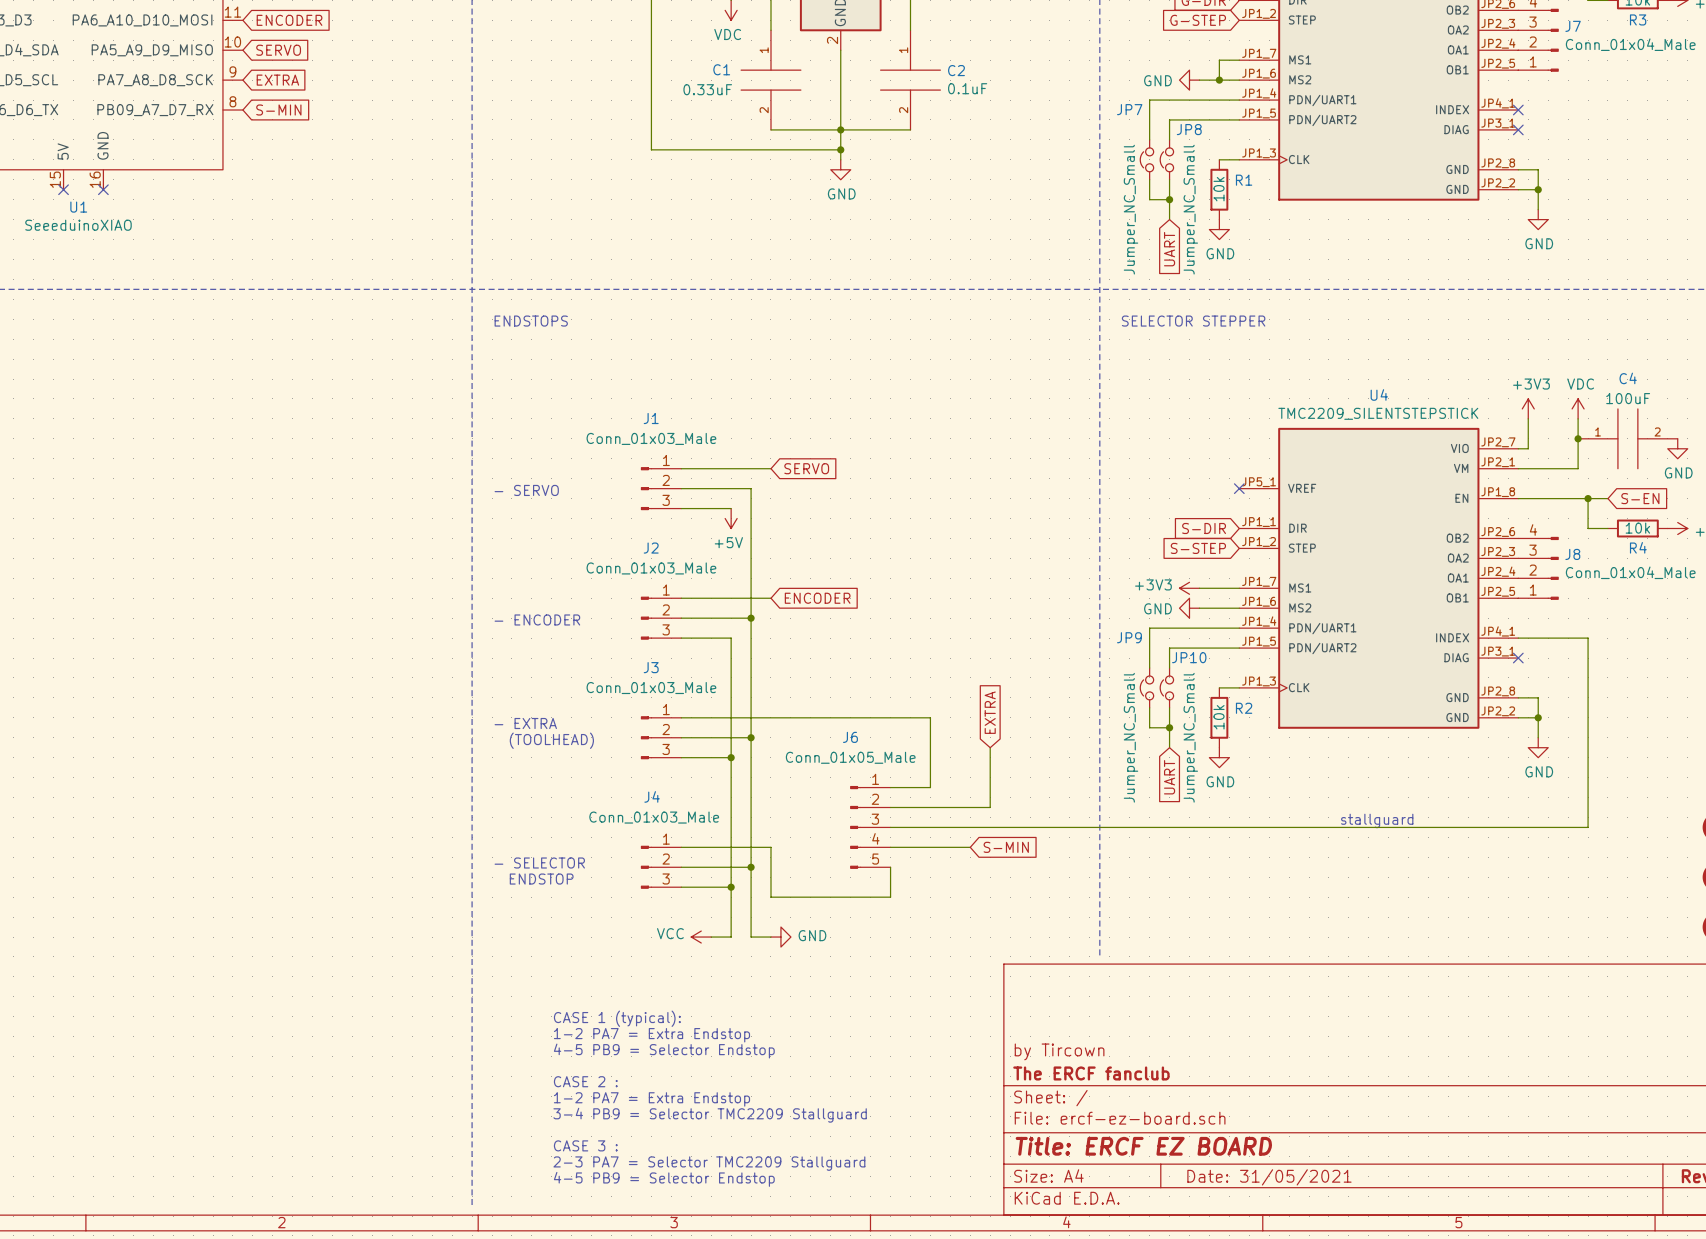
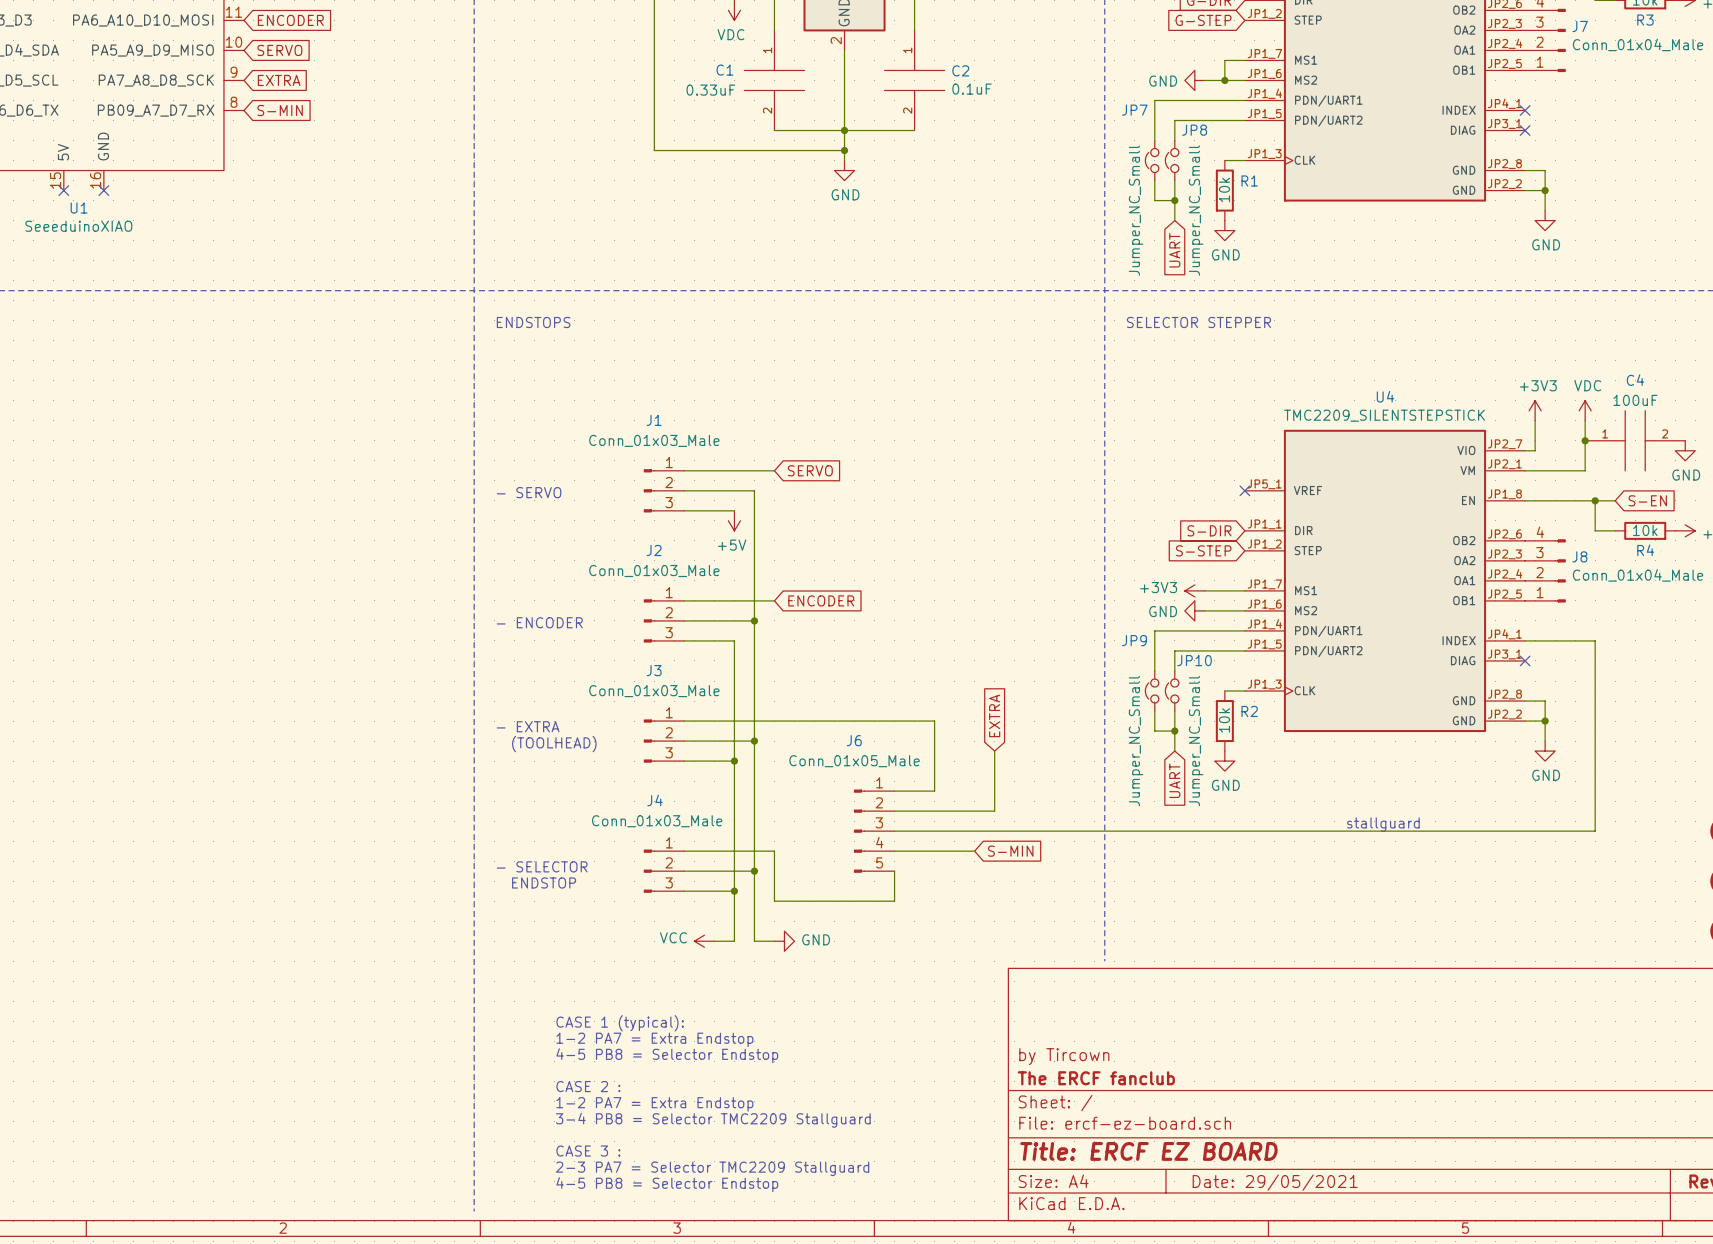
text: 4-5 PB9 = Selector Endstop (664, 1051) -> 4-5 PB8 = Selector Endstop (667, 1055)
text: 3-4 PB9 = Selector TMC2209 Stallguard (710, 1115) -> 3-4 PB8 = Selector TMC2209 Stallguard (713, 1120)
title block: Date: 31/05/2021 (1269, 1177) -> Date: 29/05/2021 (1275, 1182)
text: 4-5 PB9 = Selector Endstop (664, 1179) -> 4-5 PB8 = Selector Endstop (667, 1184)

